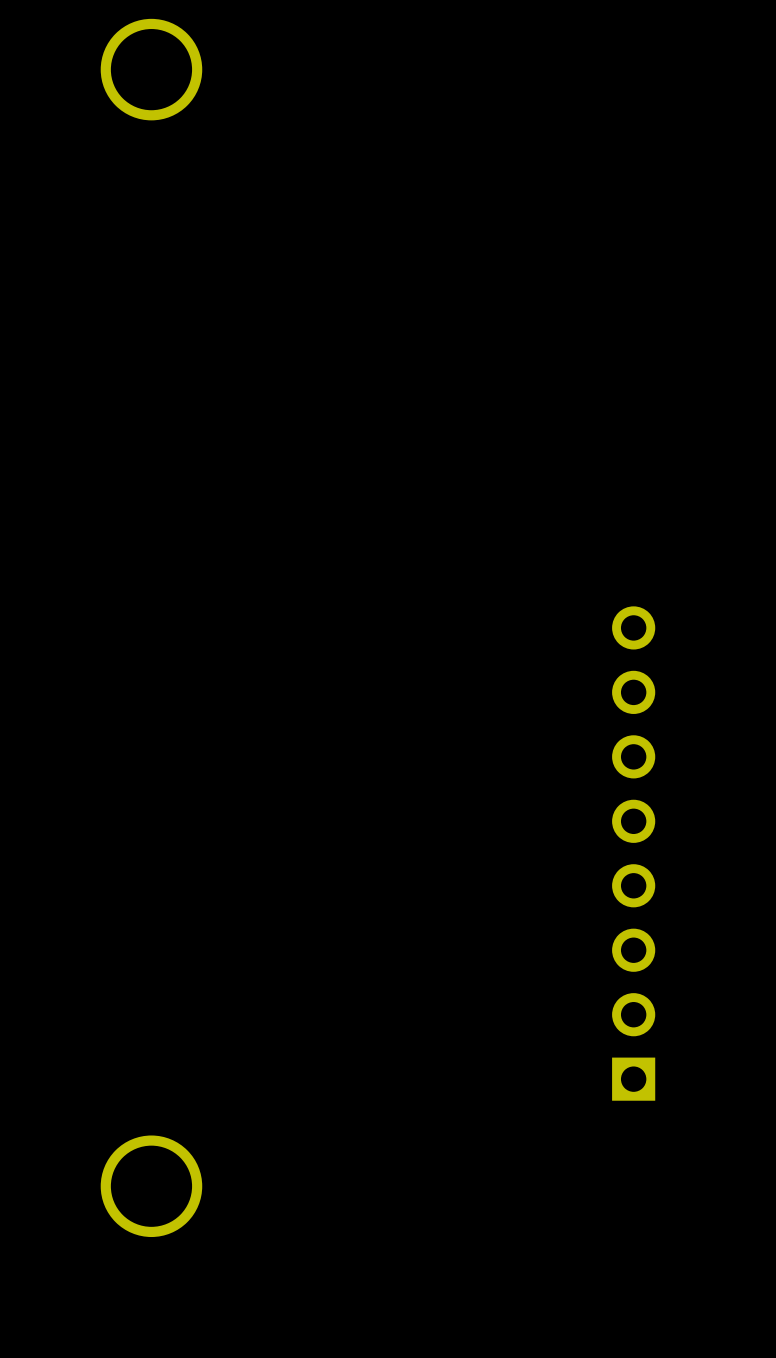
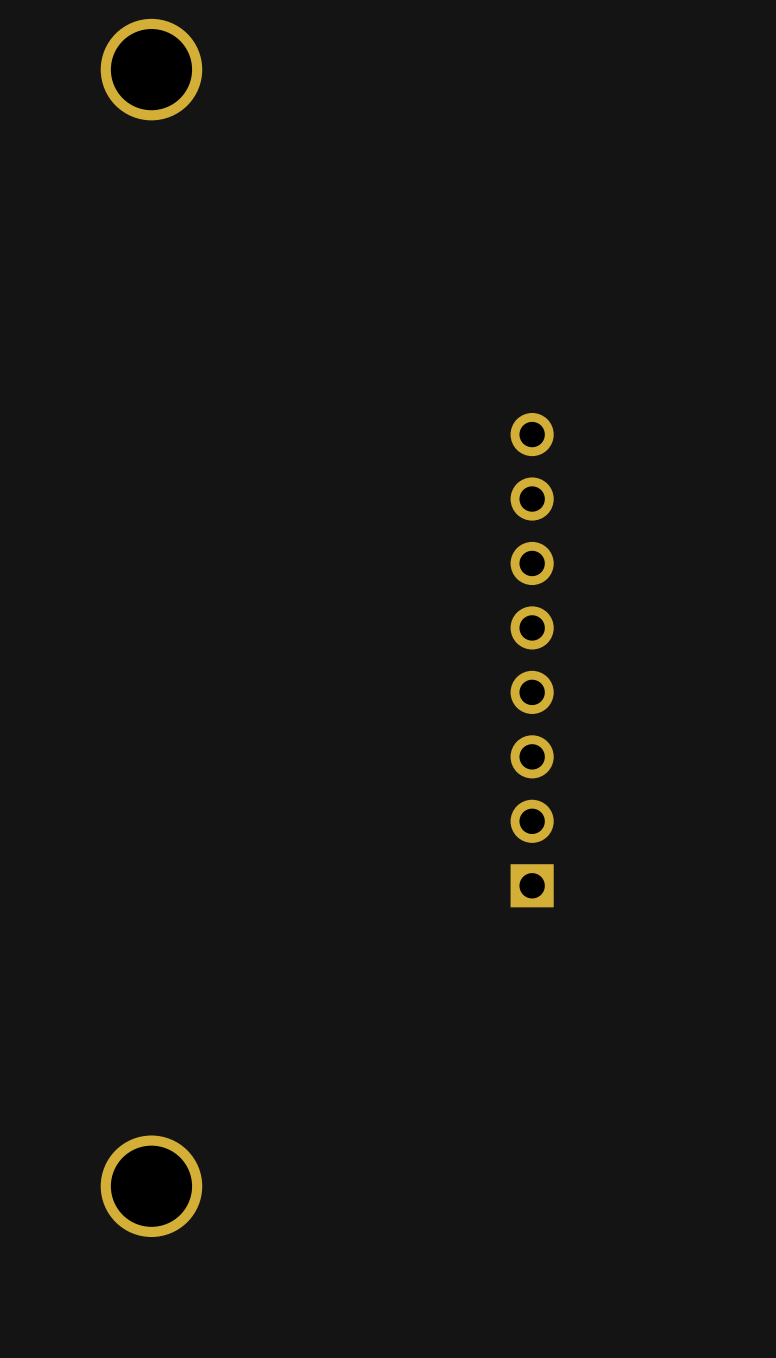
part position: (633, 853) -> (532, 660)

